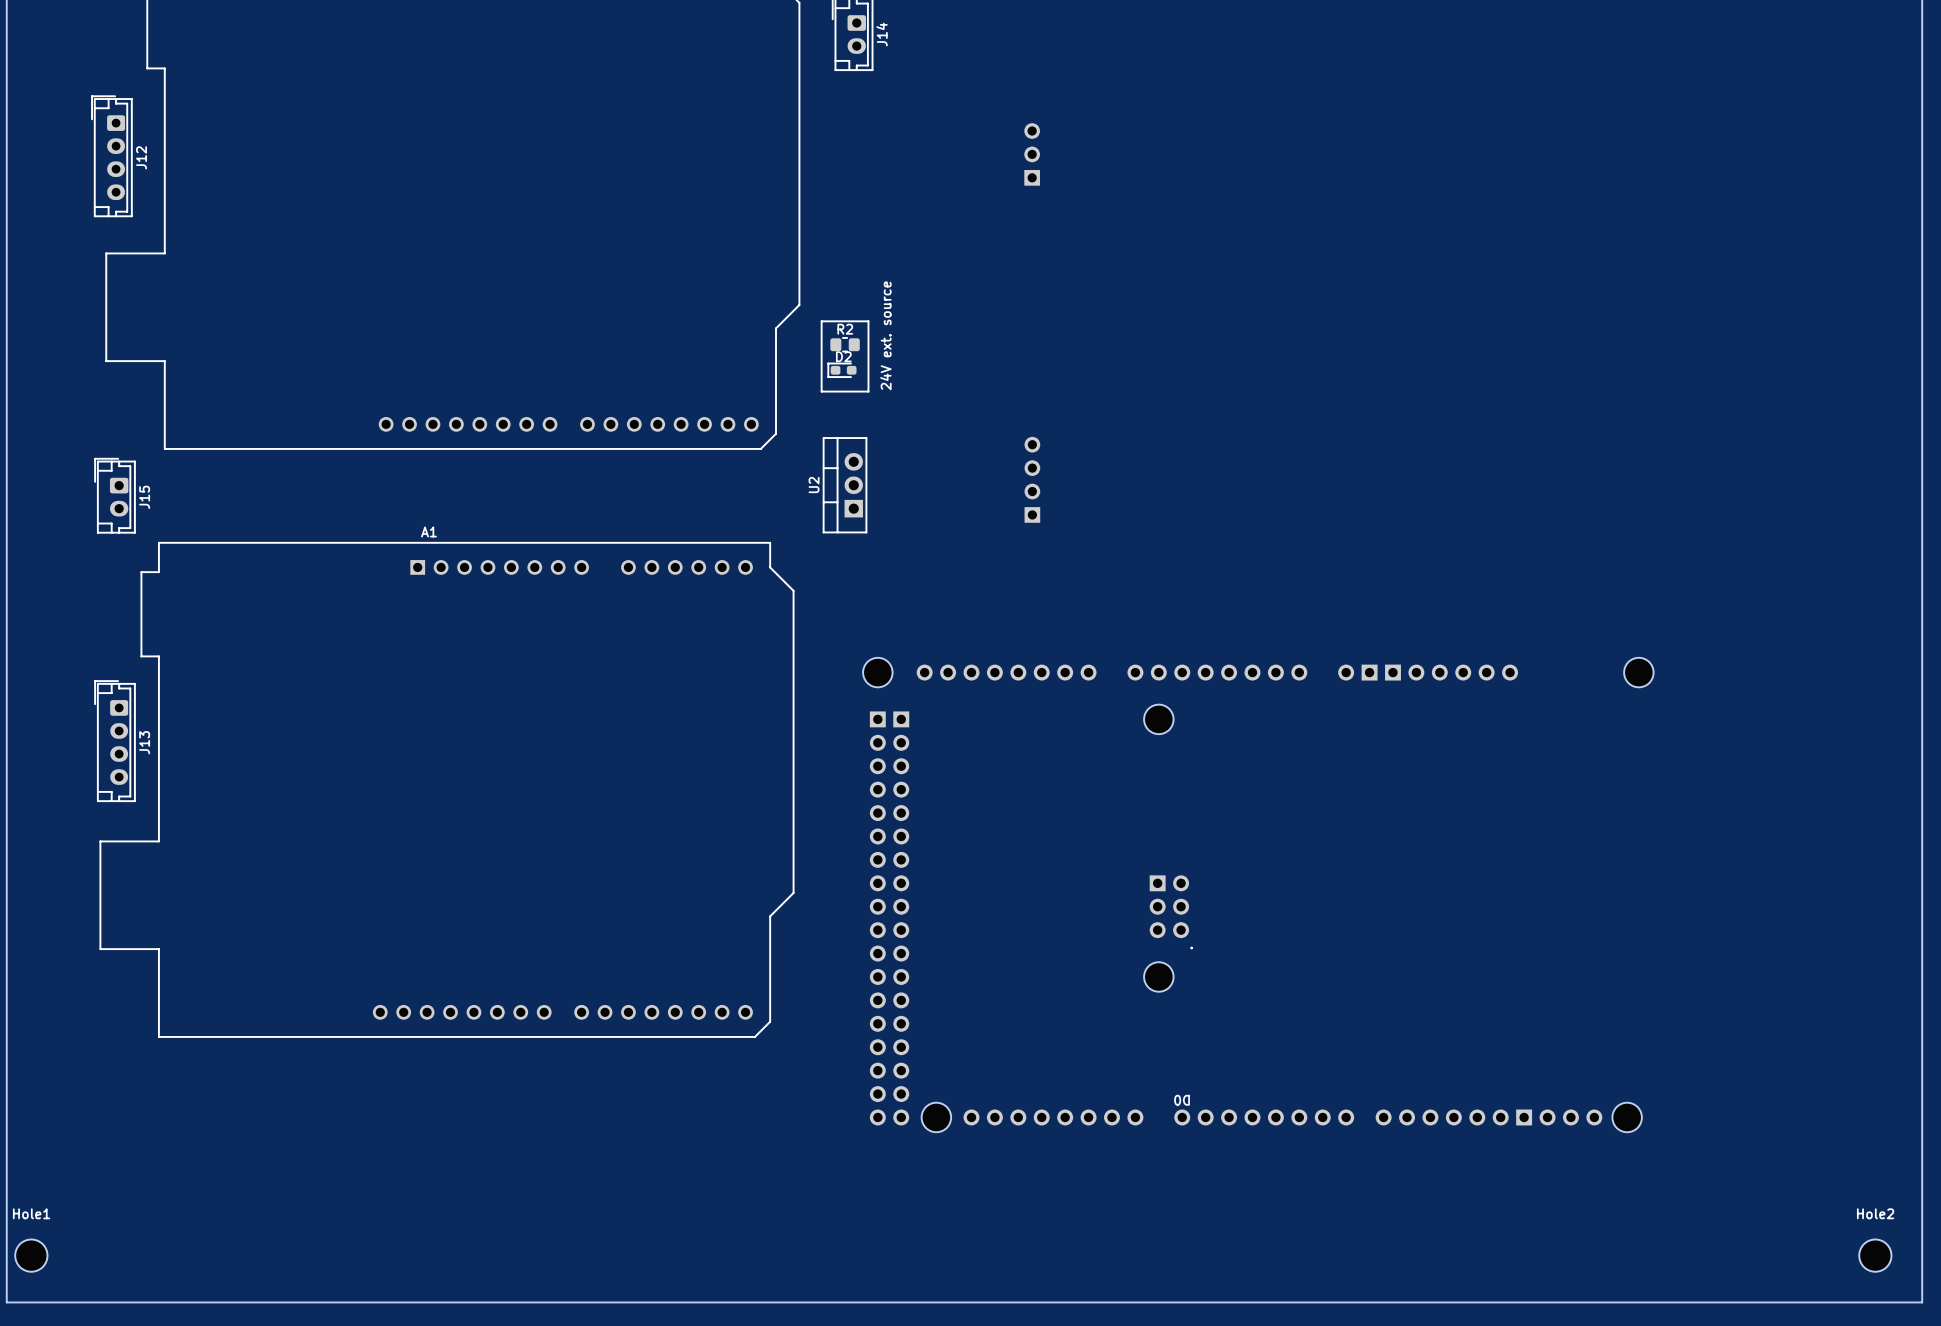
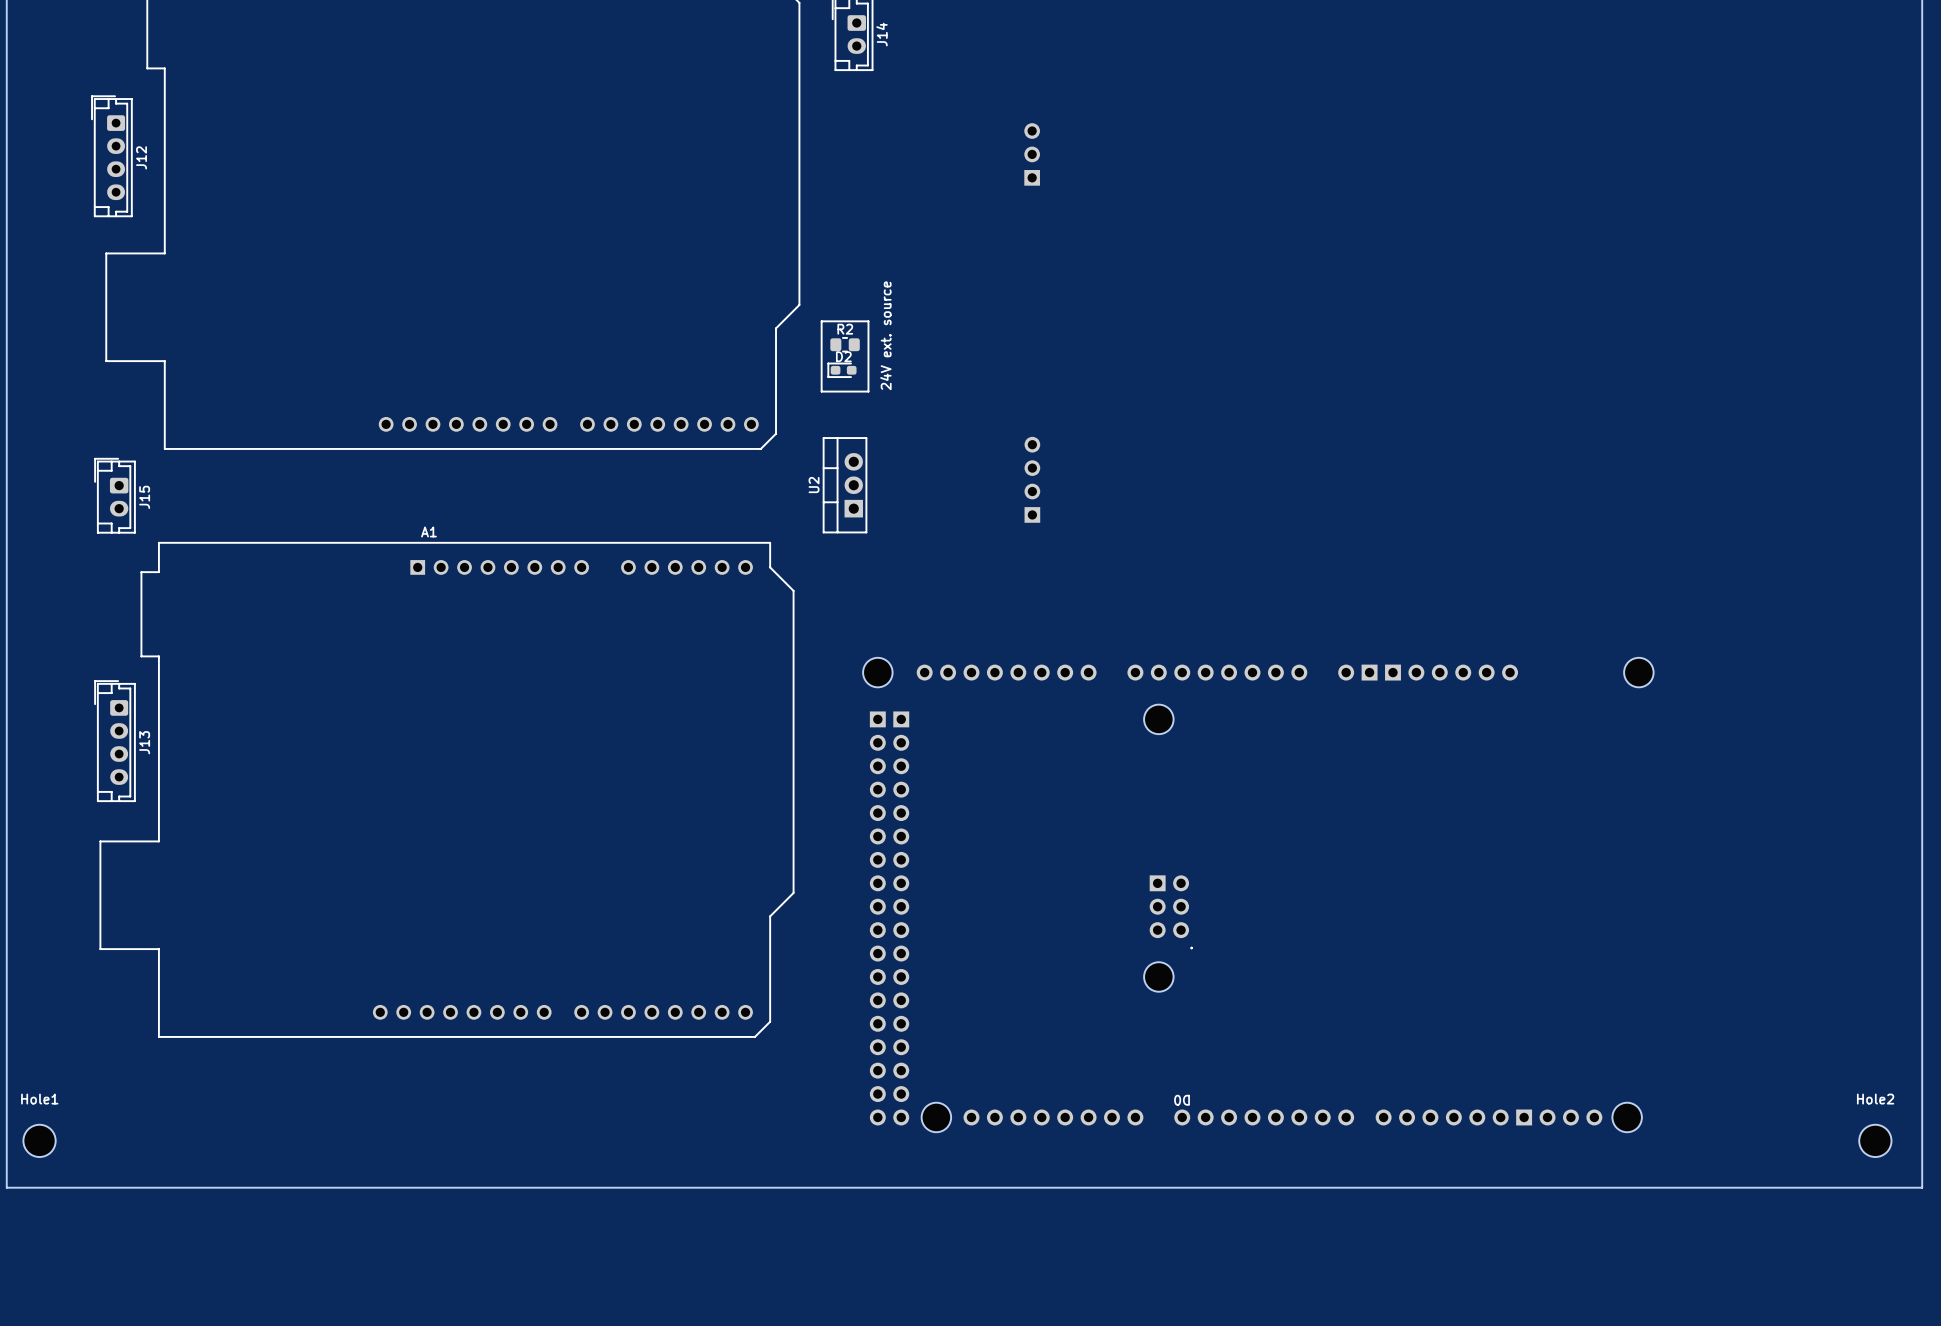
board edge: (6, 1187) (6, 1302) (1922, 1302) (1922, 1187) -> (6, 1187) (1922, 1187)
Hole1 position: (31, 1255) -> (39, 1140)
Hole2 position: (1875, 1255) -> (1875, 1140)

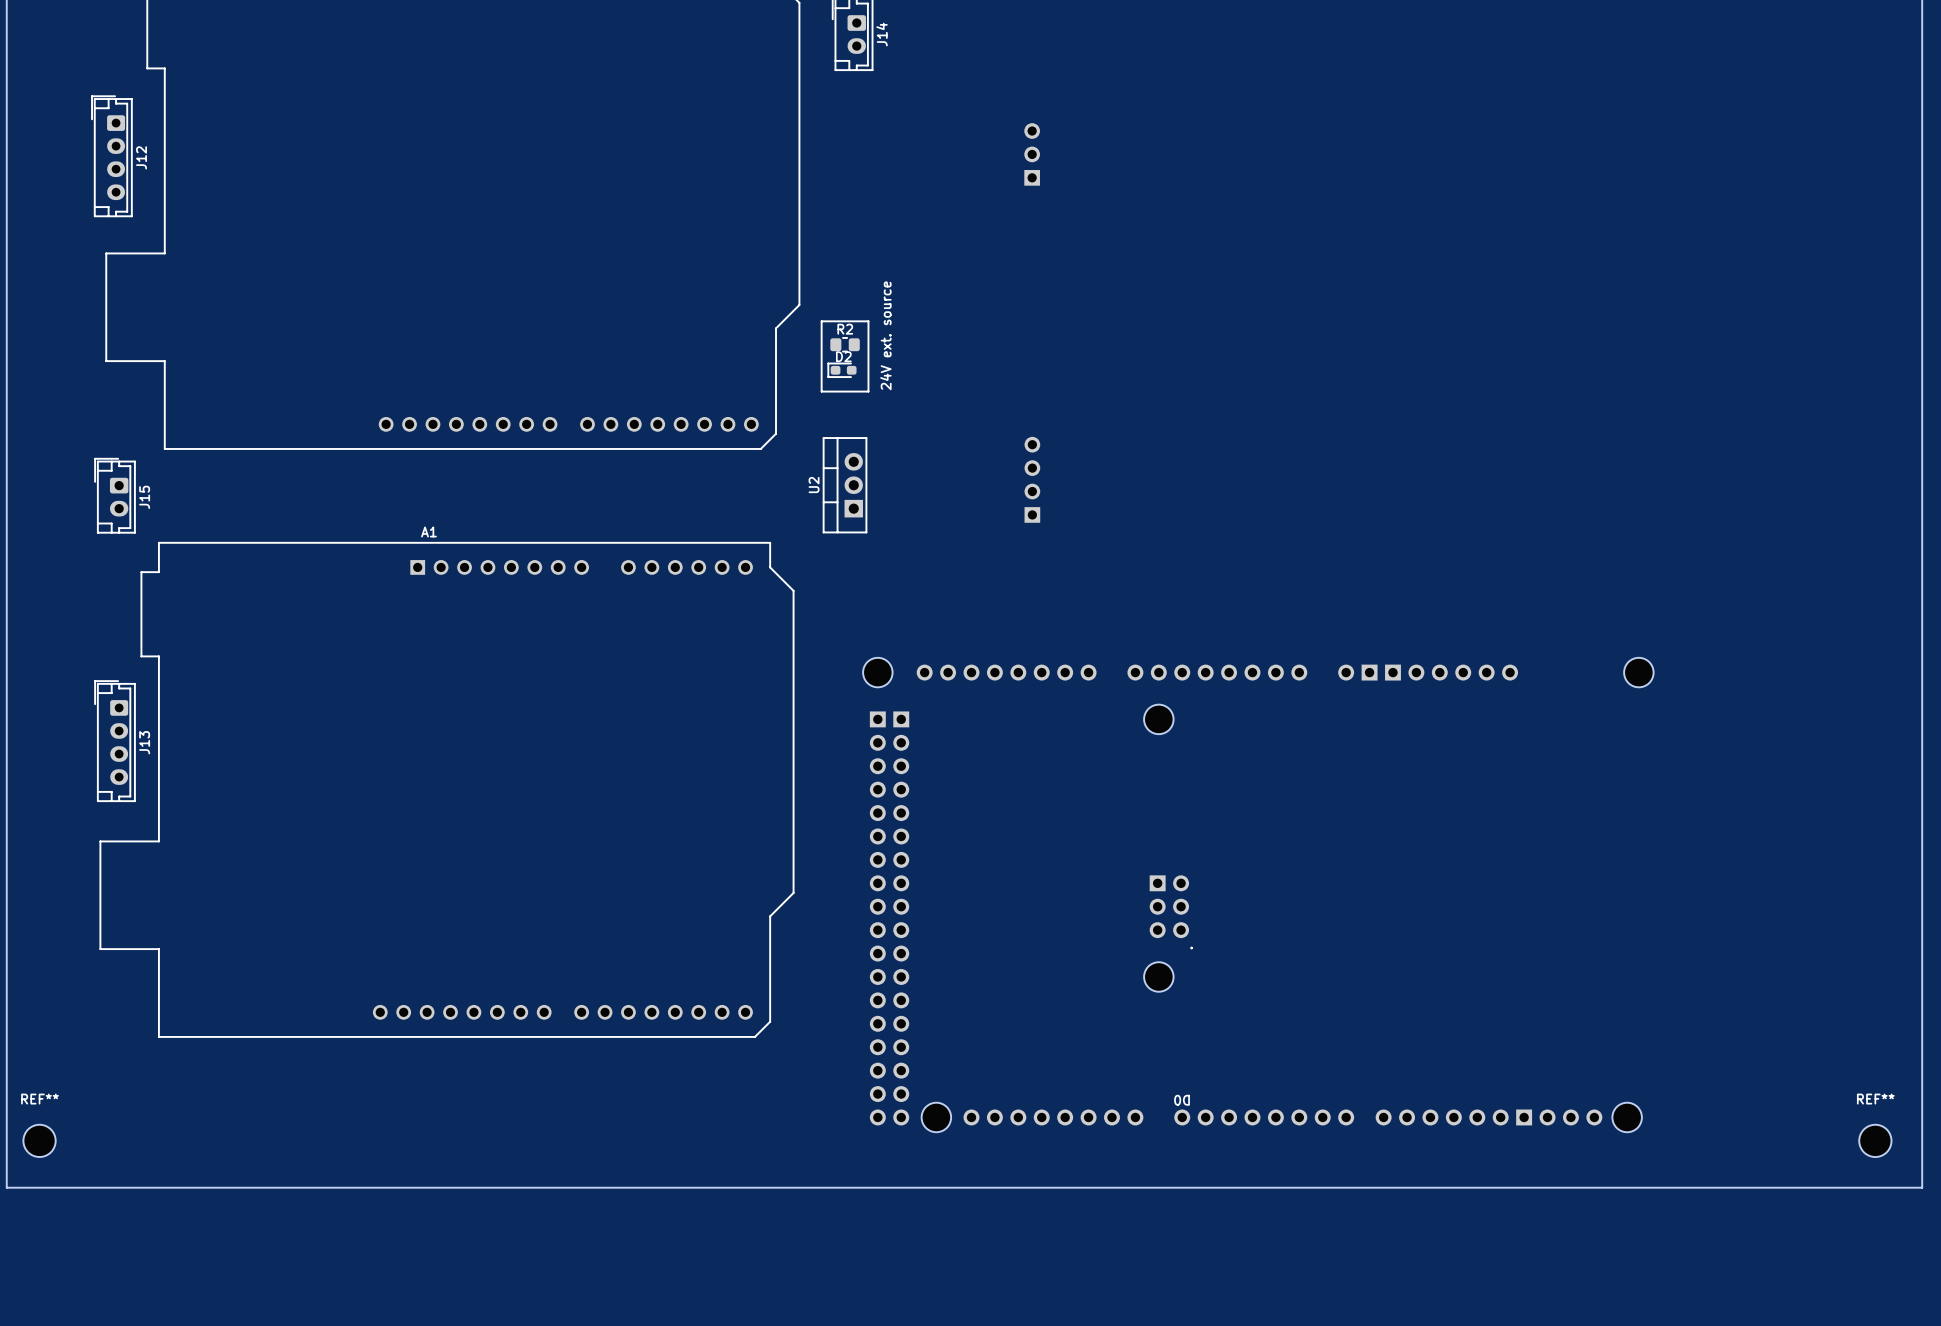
Hole1 name: Hole1 (39, 1099) -> REF** (39, 1099)
Hole2 name: Hole2 (1875, 1099) -> REF** (1875, 1099)

